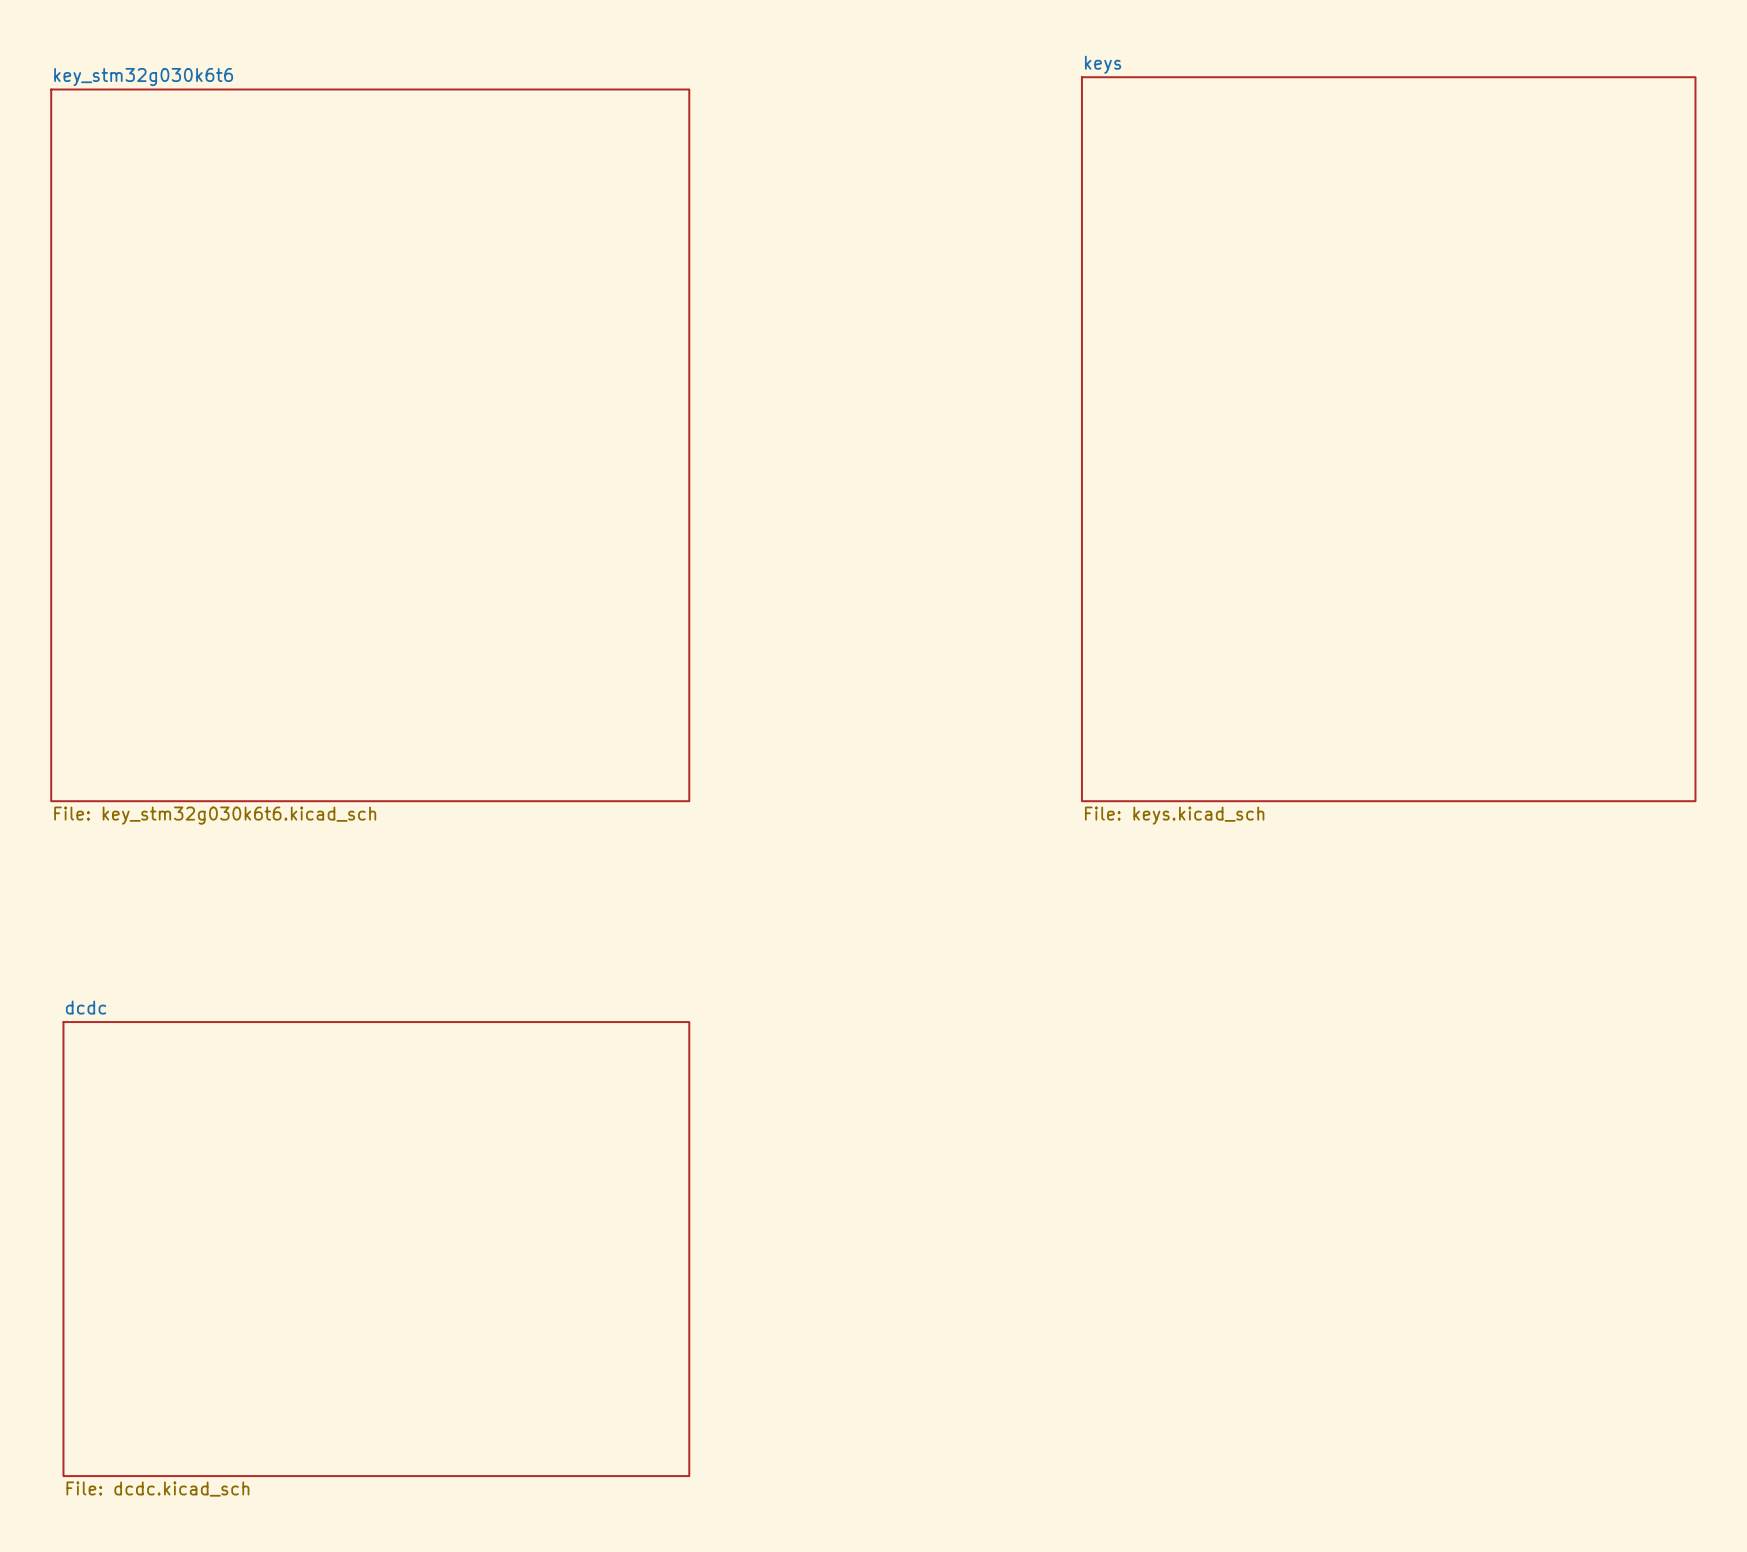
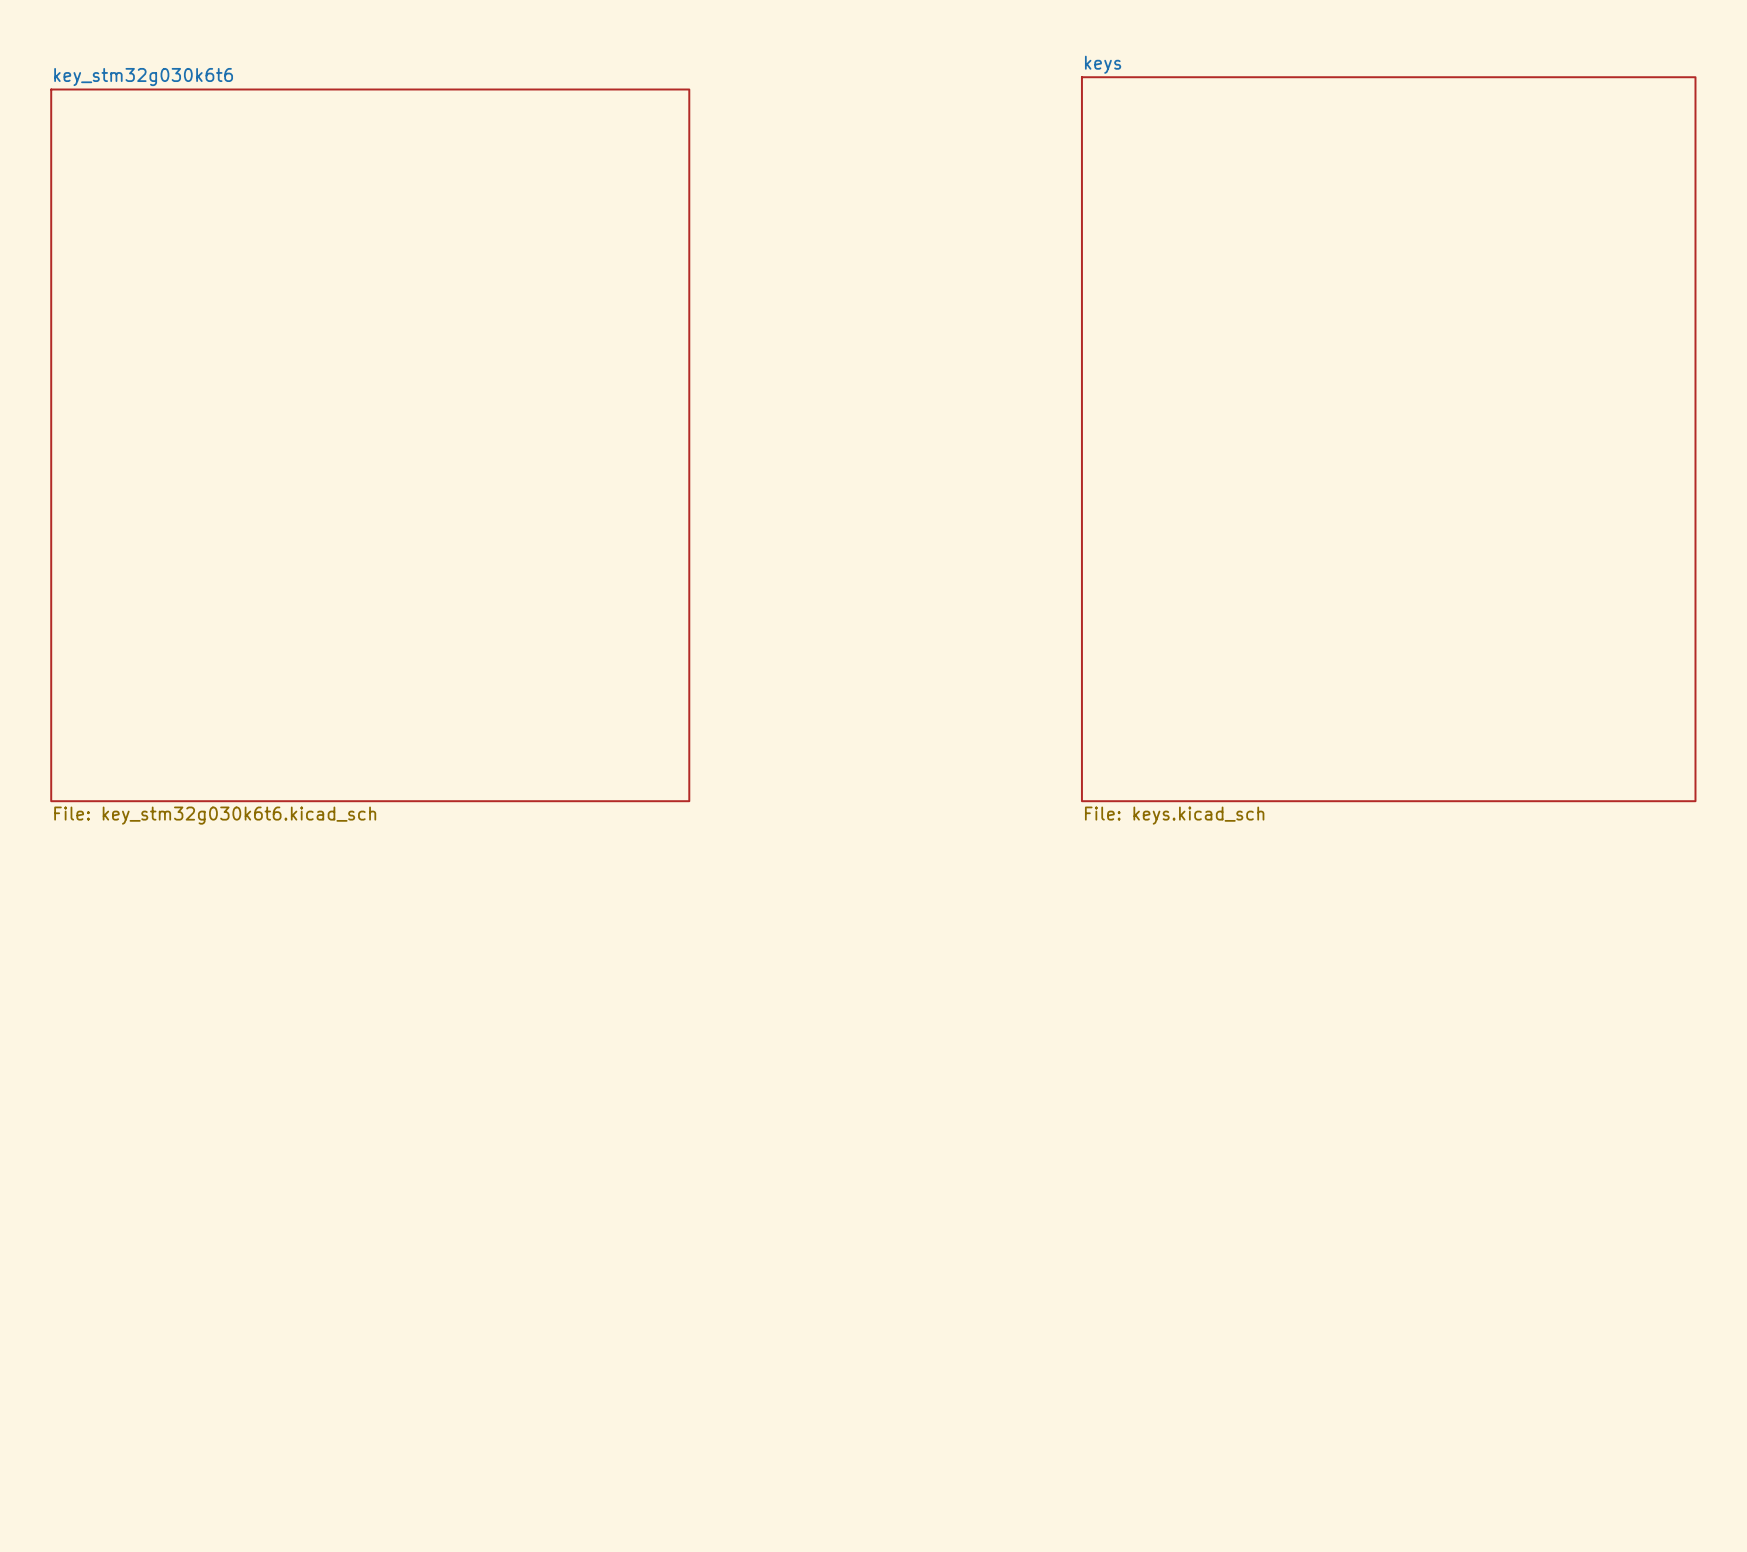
sheet dcdc: File: dcdc.kicad_sch (376, 1249) -> none

